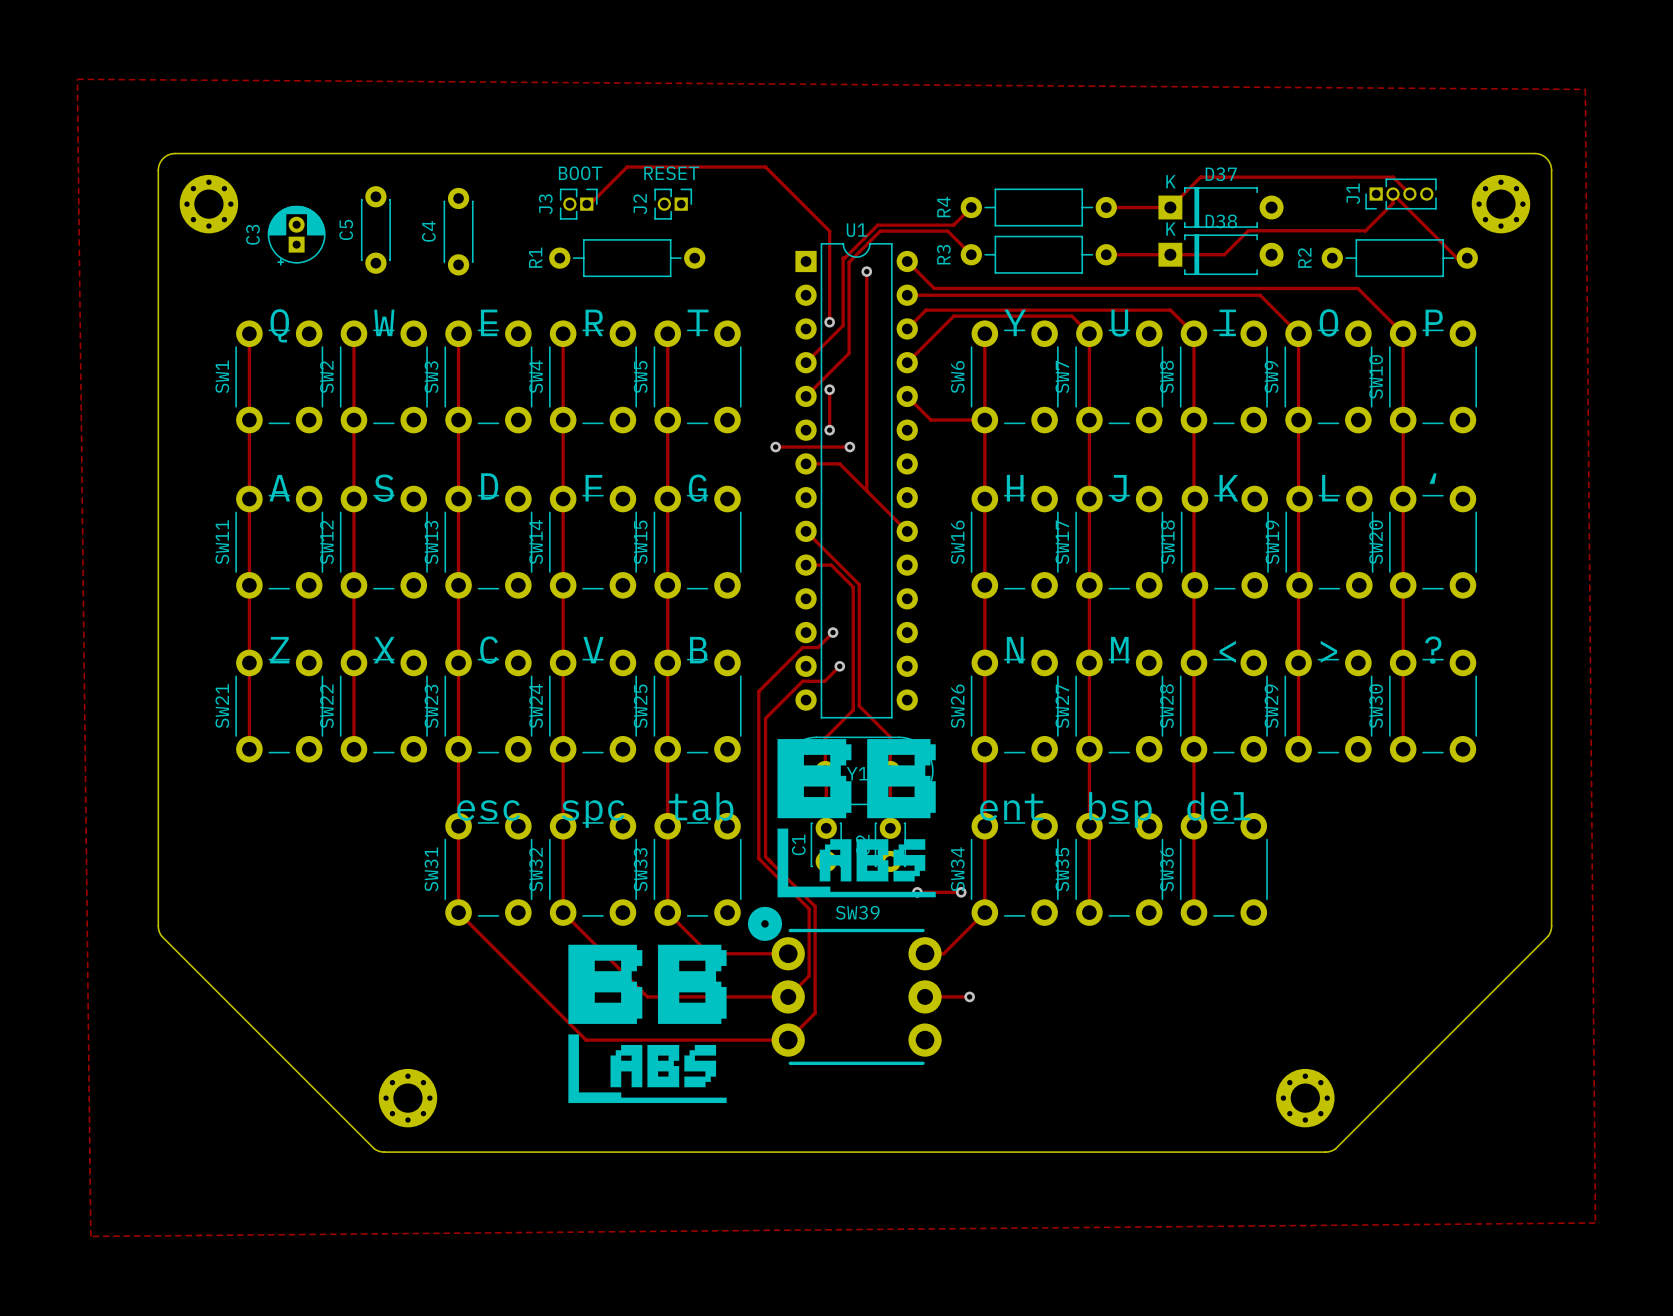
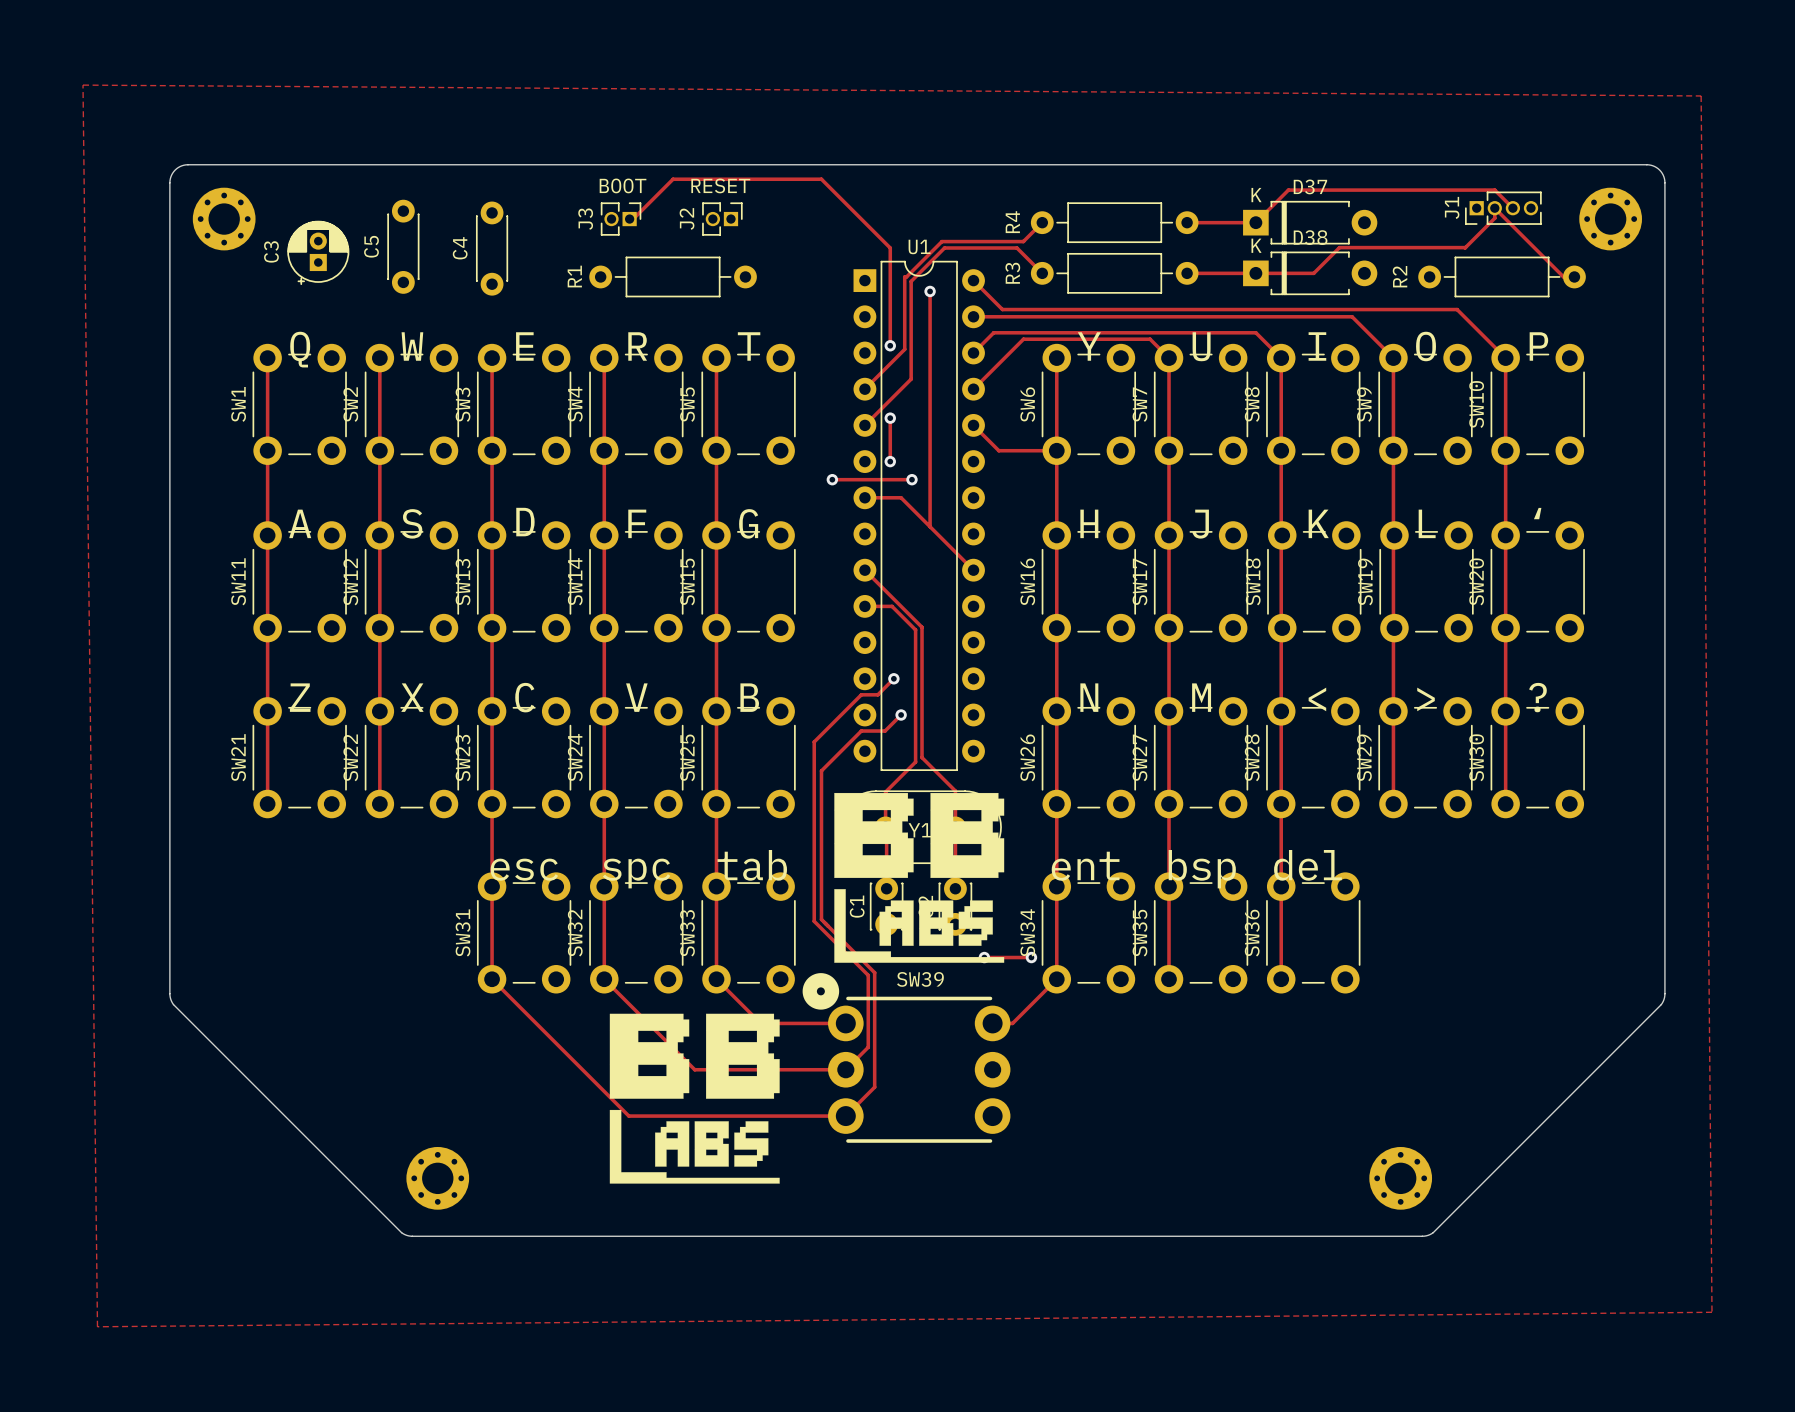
track: (925, 996) (969, 996) -> none
via: (969, 996) -> none

